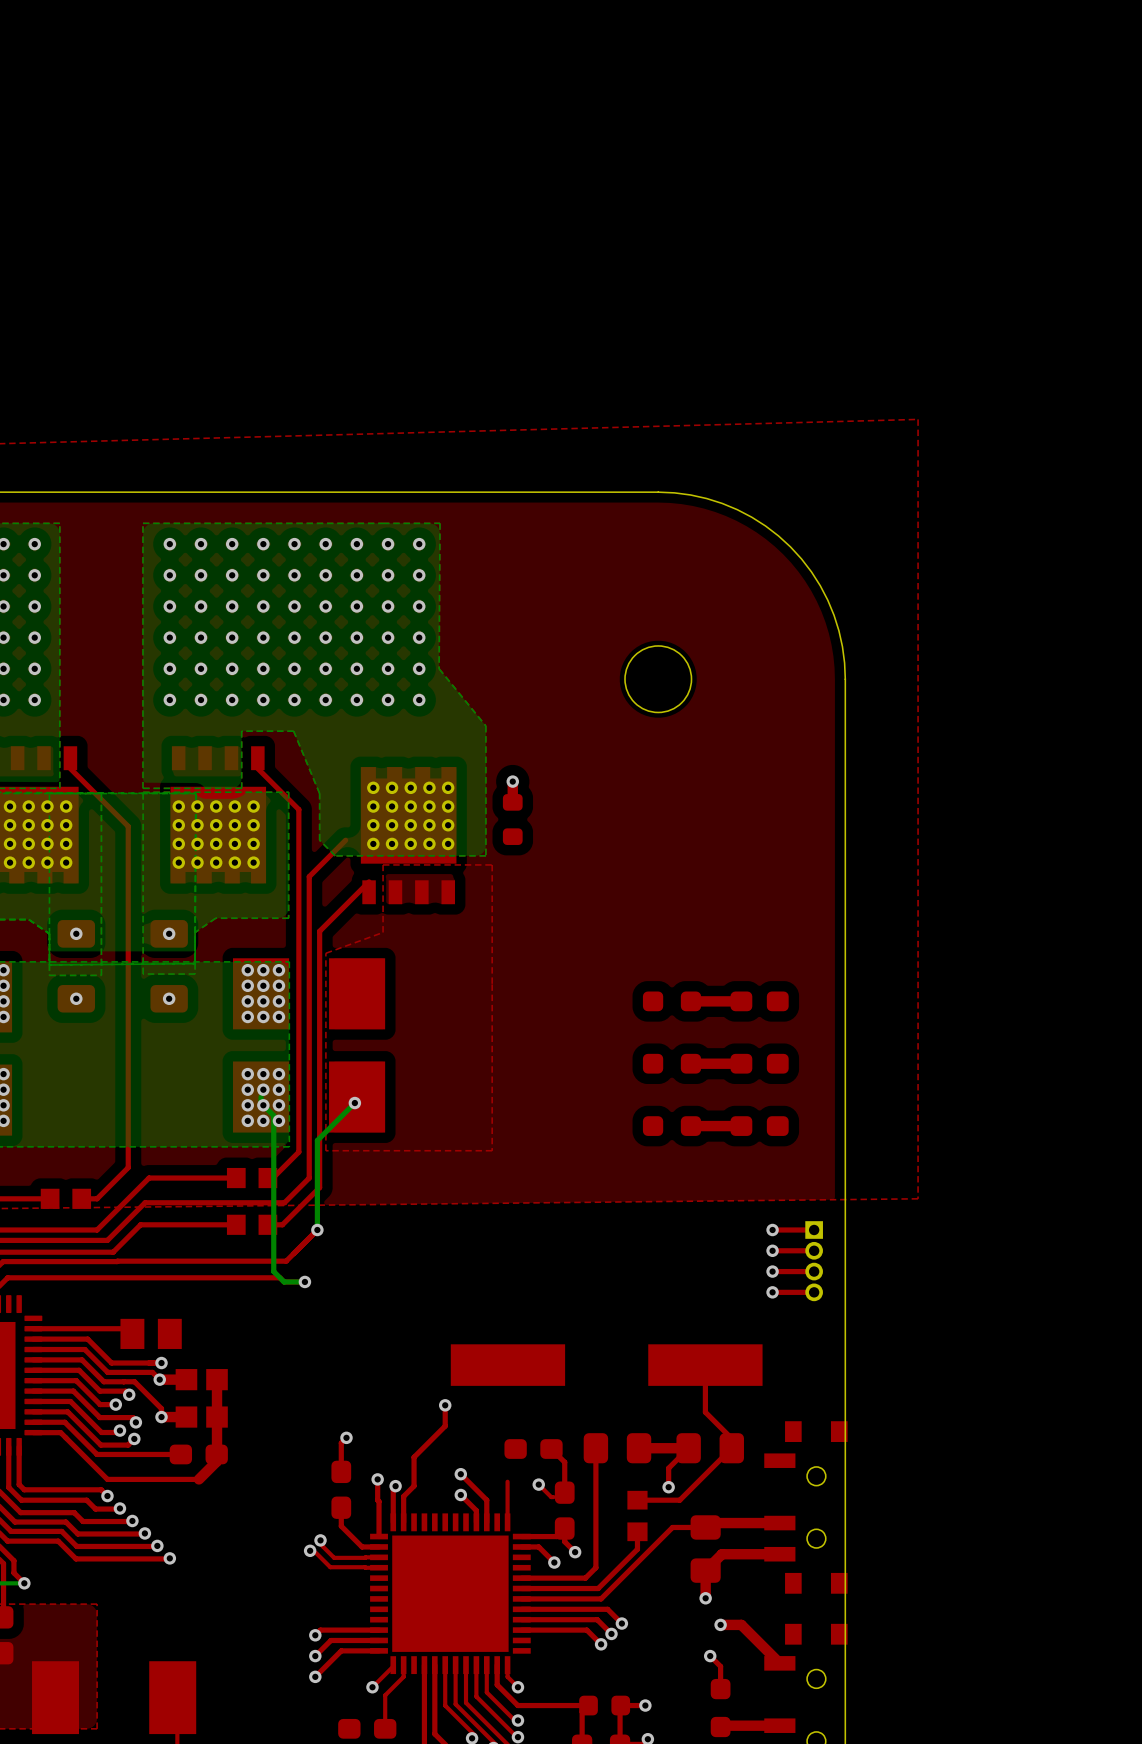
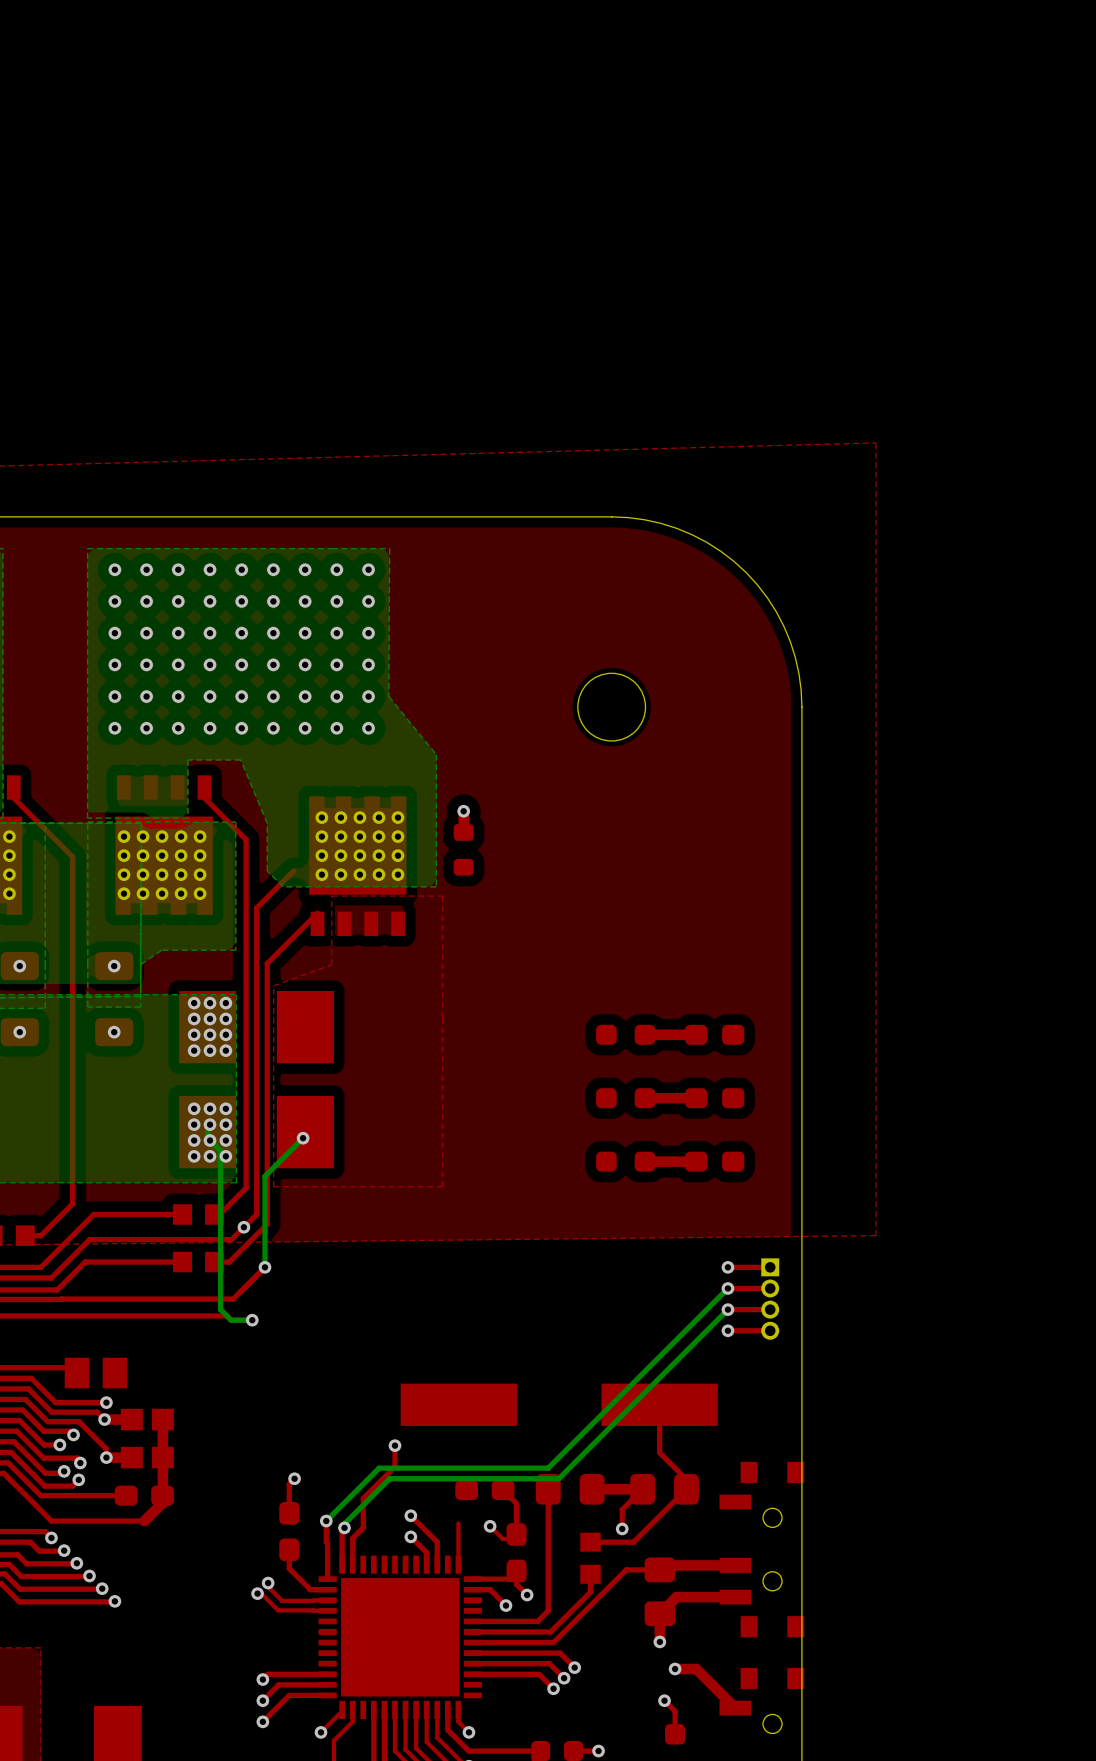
via: none -> (243, 1227)
bottom track: none -> (727, 1288) (548, 1468) (379, 1468) (326, 1521)
bottom track: none -> (727, 1309) (558, 1478) (389, 1478) (344, 1523) (344, 1527)

